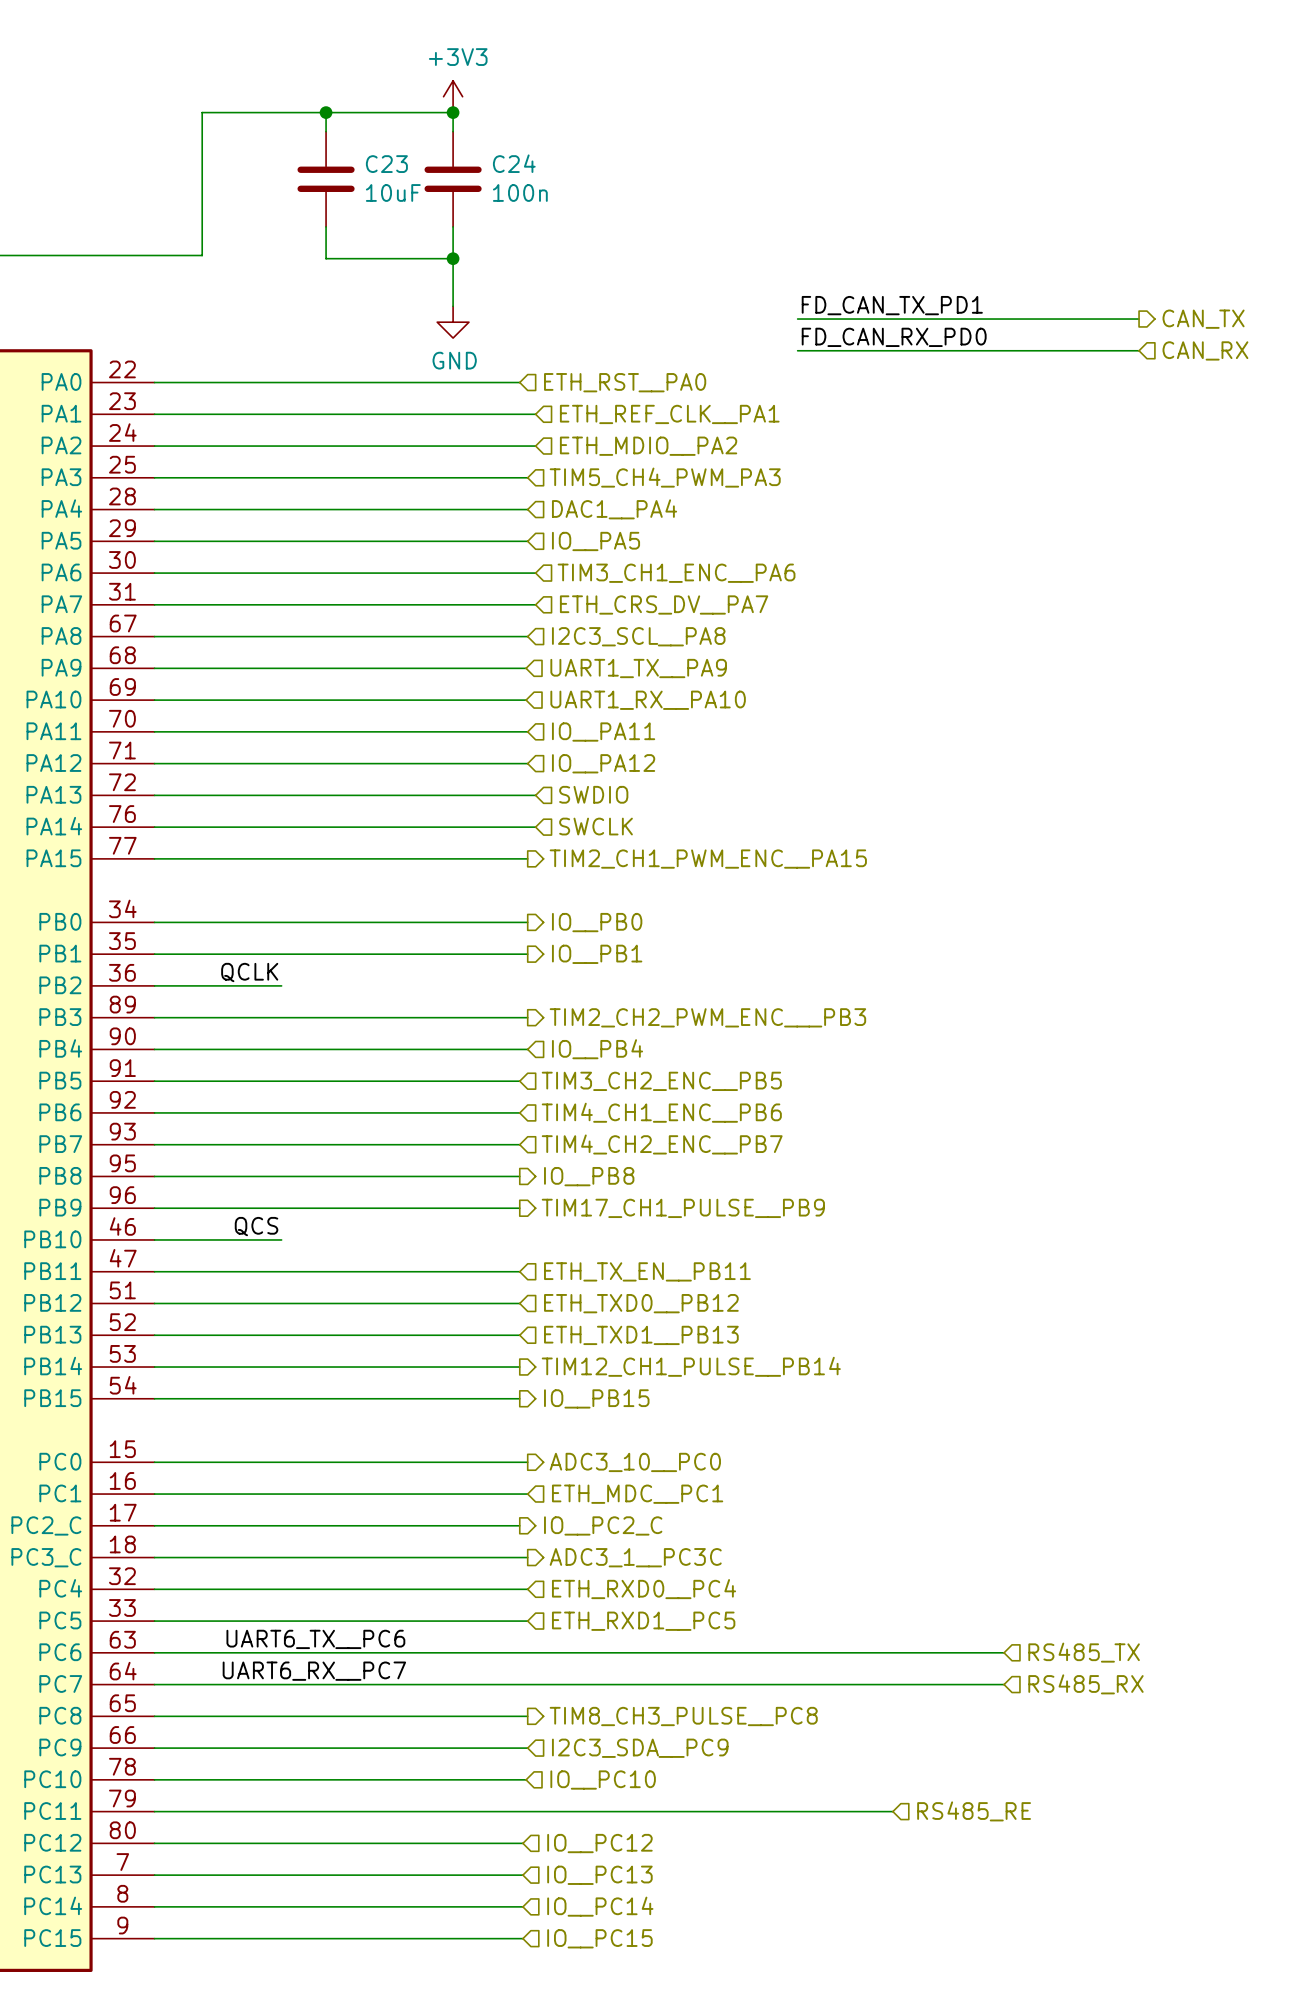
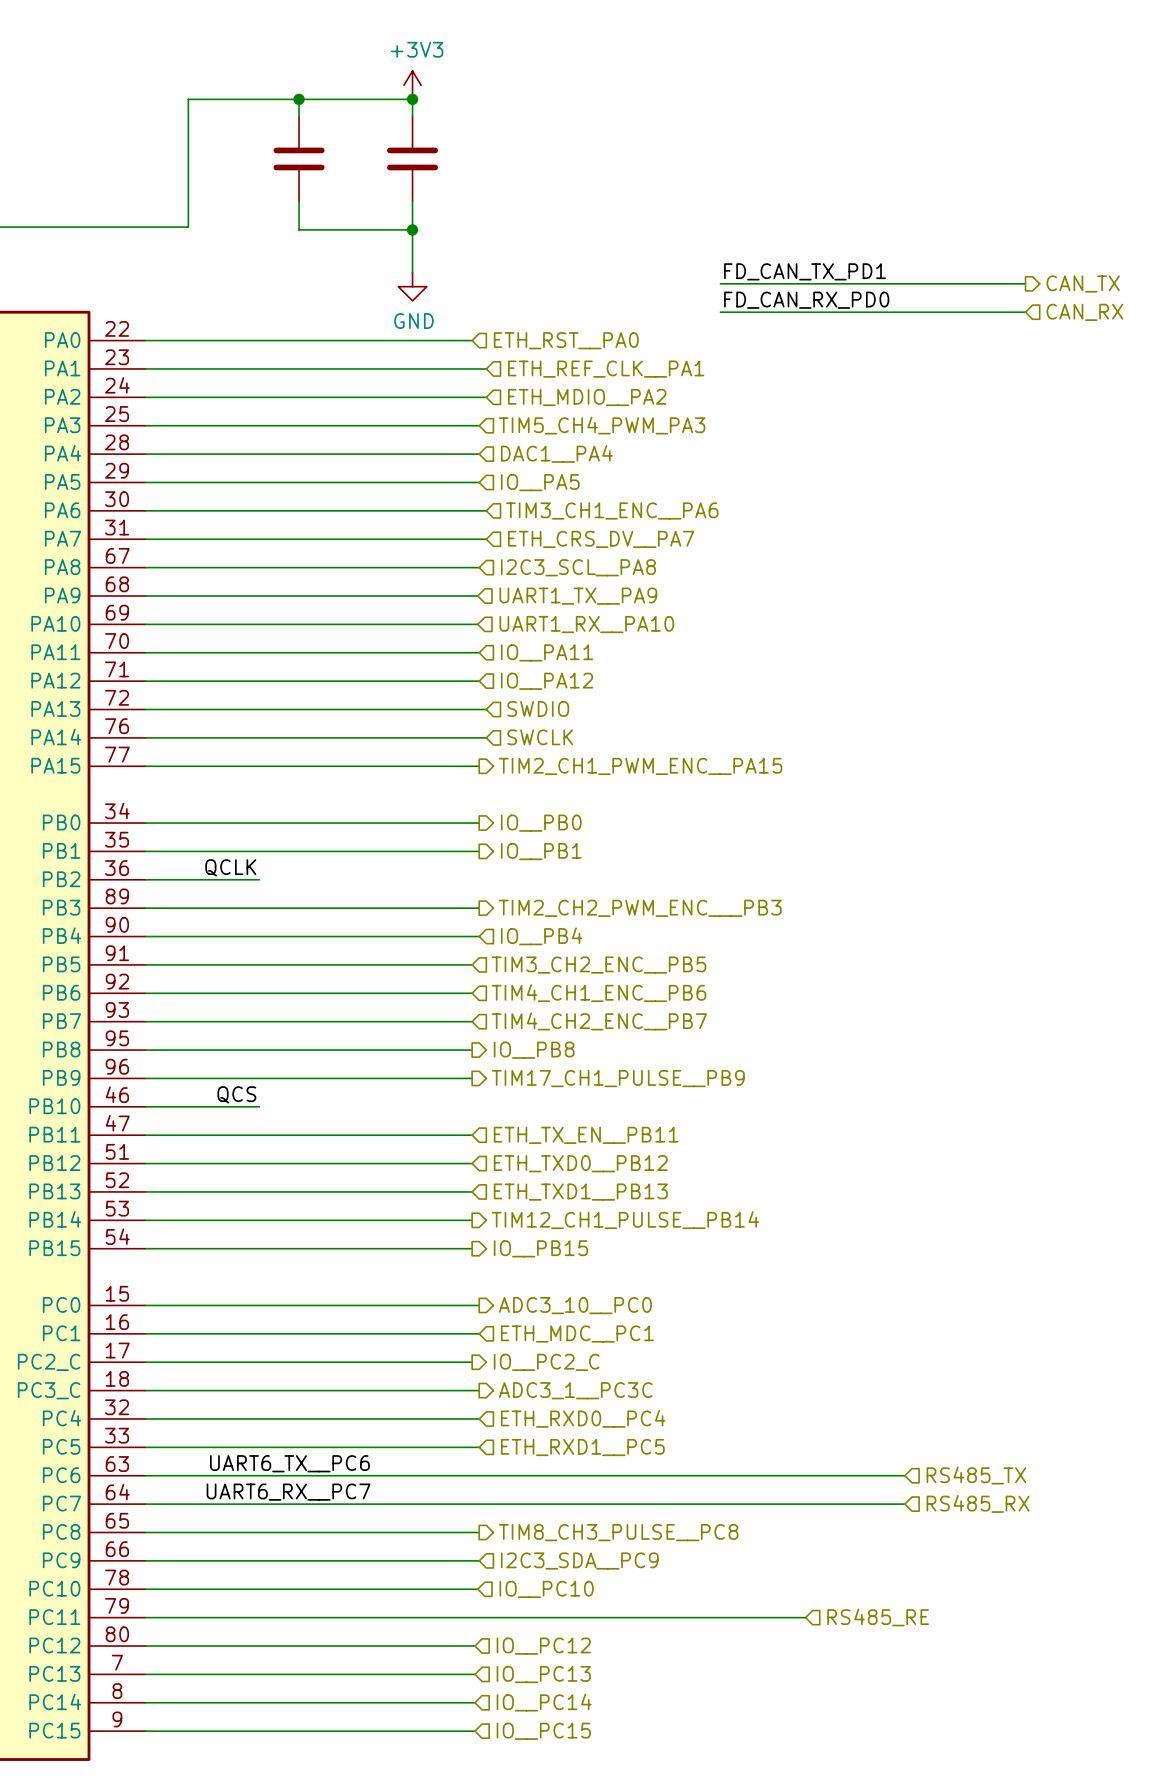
C24 name: C24 (514, 163) -> none
C23 name: C23 (386, 164) -> none
C23 value: 10uF (393, 192) -> none
C24 value: 100n (520, 192) -> none

